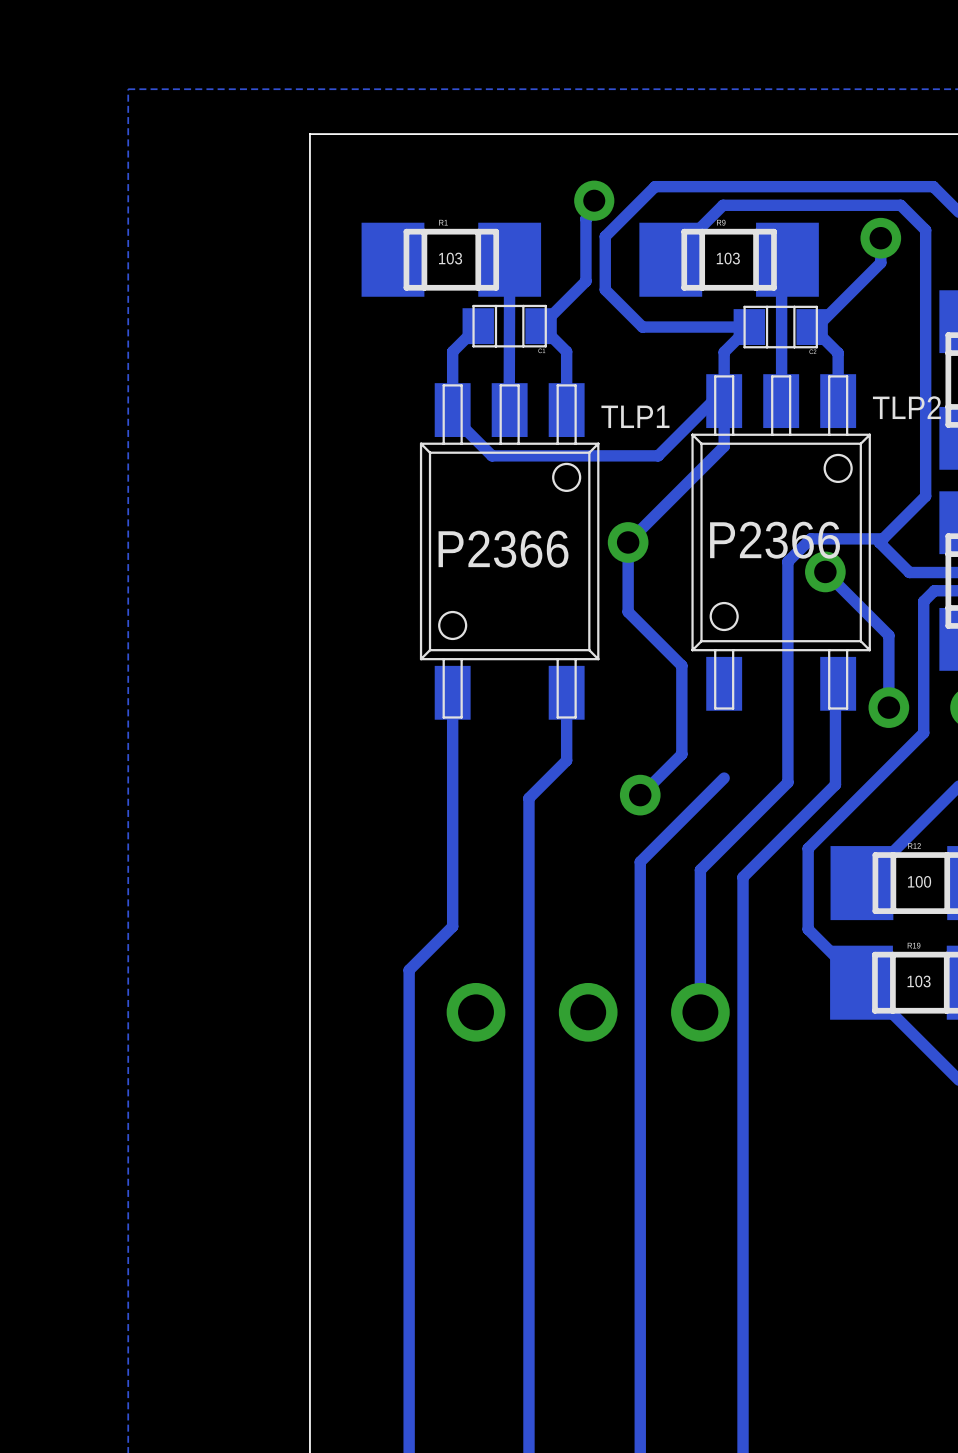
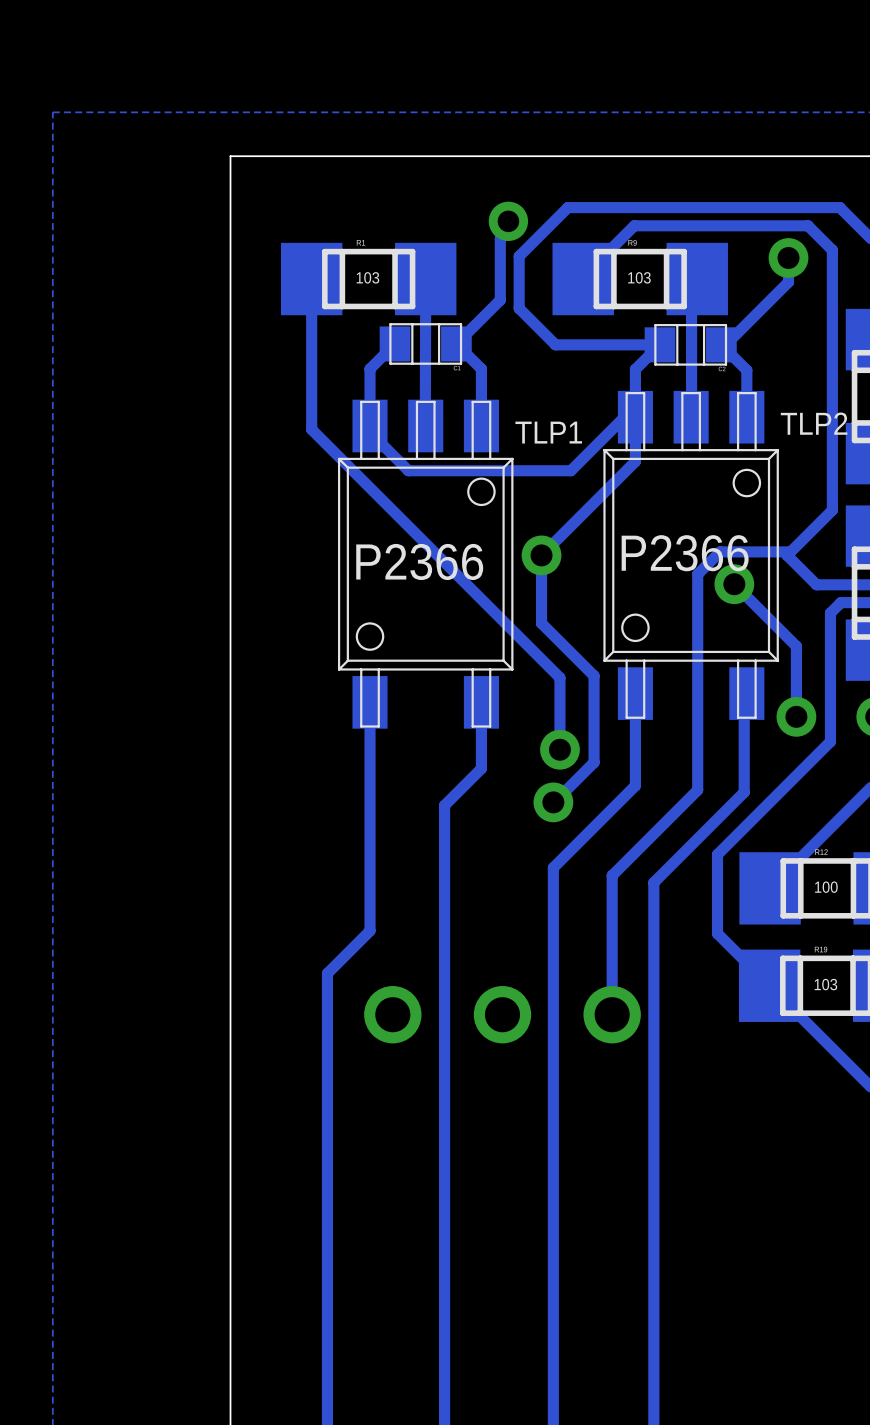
track: none -> (311, 279) (311, 429) (559, 677) (559, 749)
track: none -> (635, 693) (635, 785)
via: none -> (559, 749)

